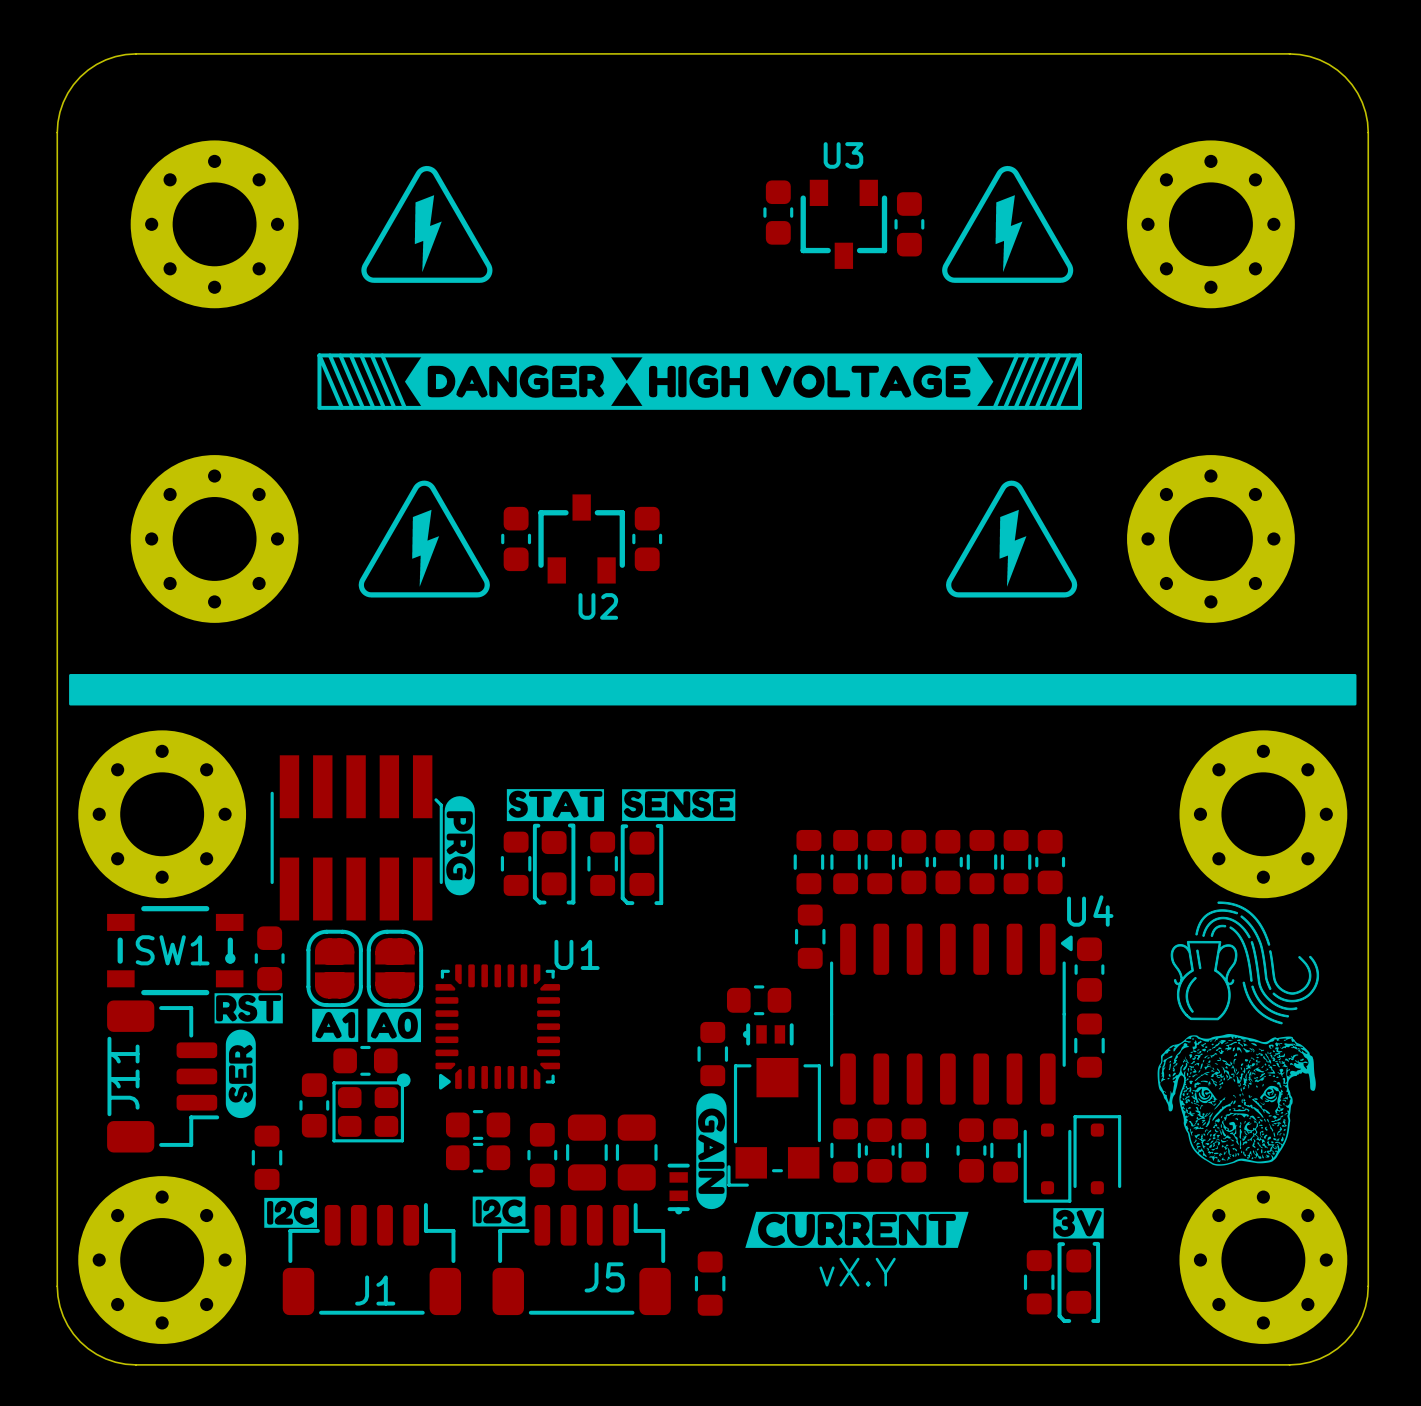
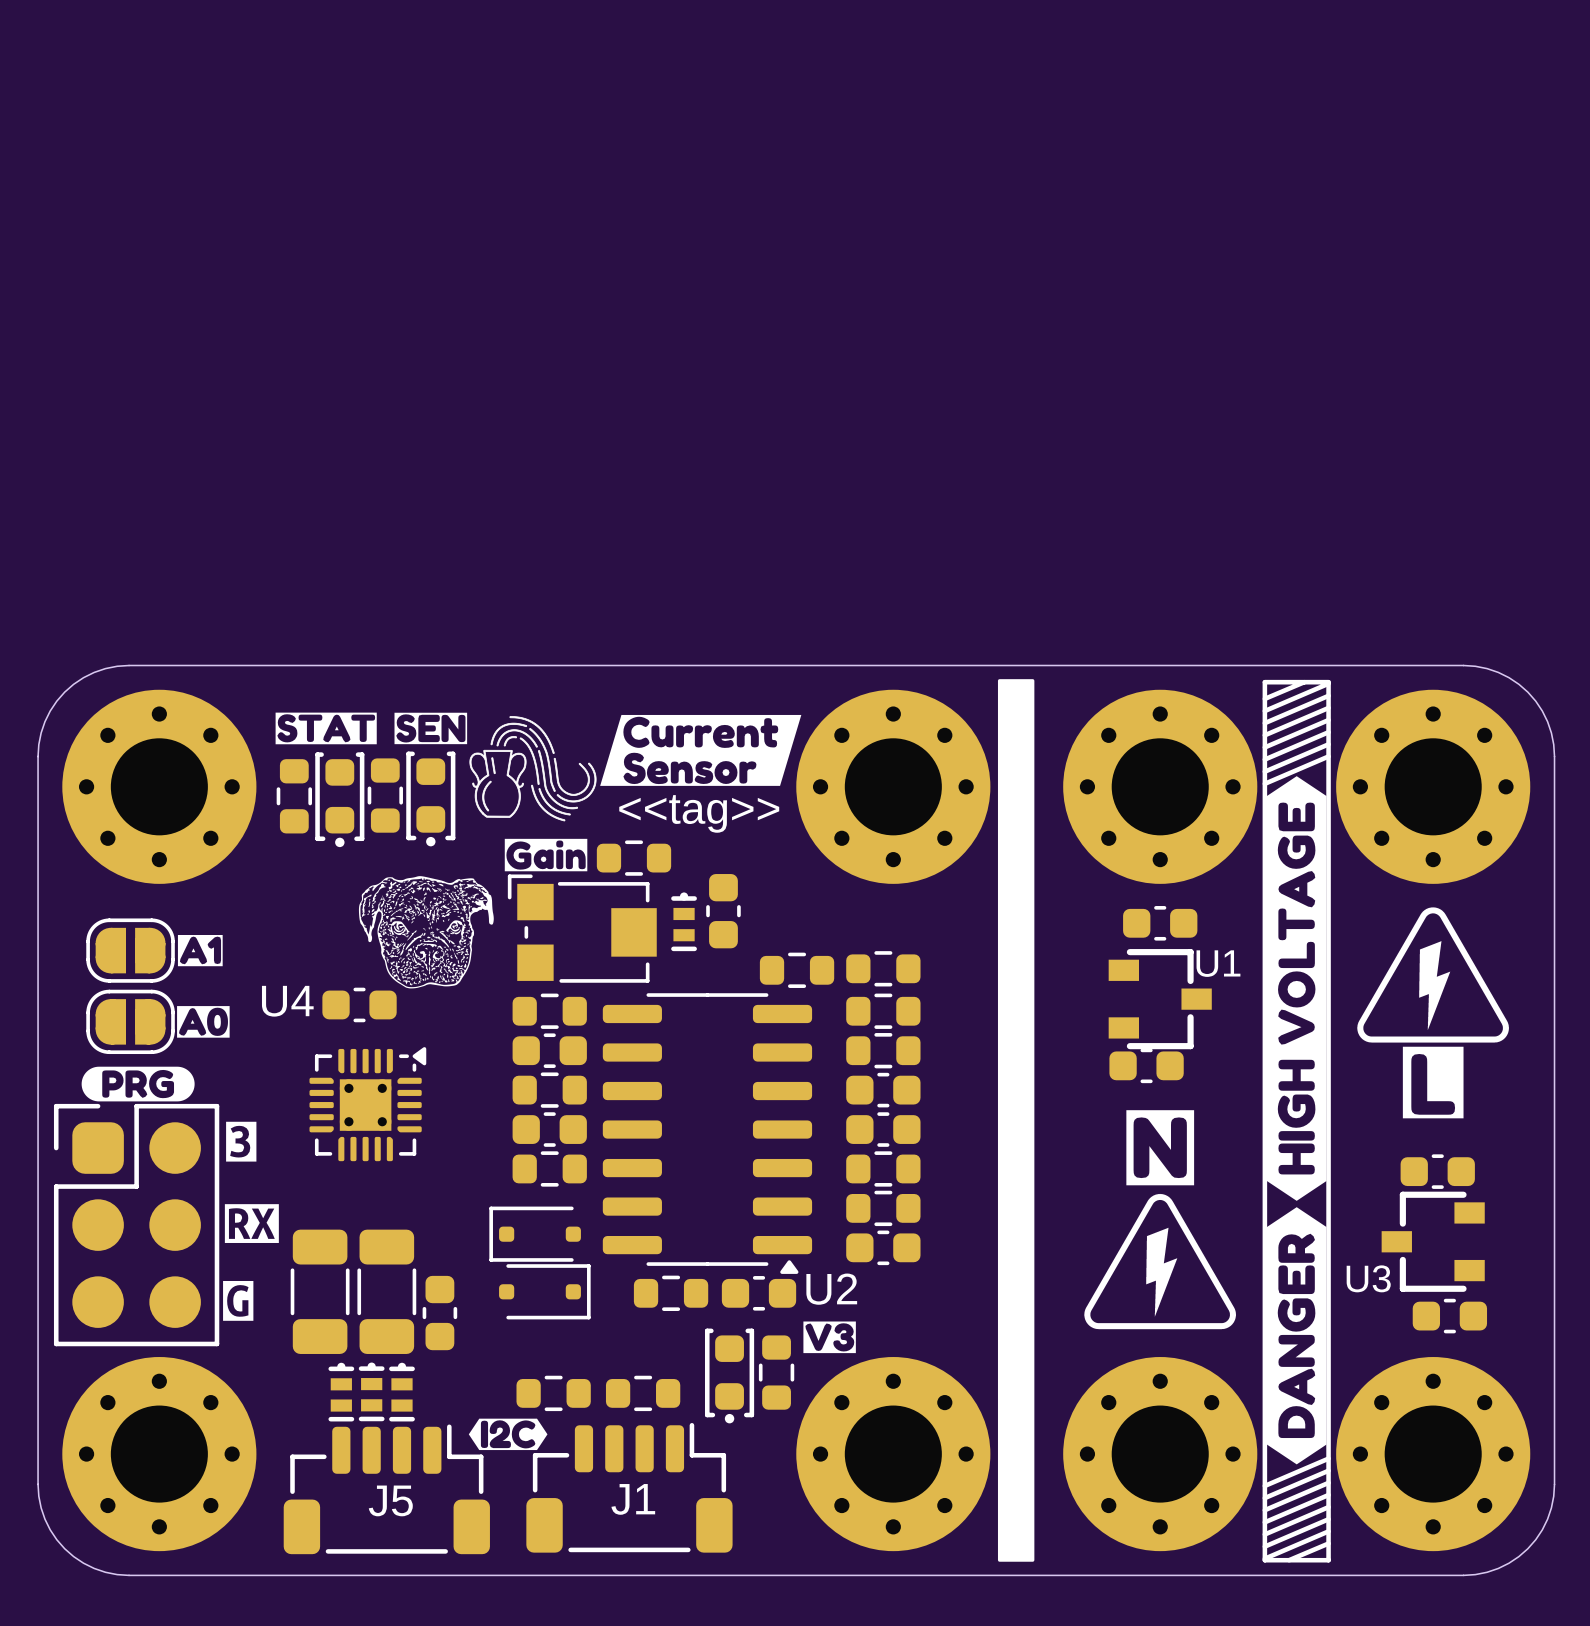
U3 name position: U3 (843, 155) -> U3 (1368, 1278)
drawing: [361, 165, 493, 283] -> none
drawing: [942, 165, 1074, 283] -> none
part: (778, 212) -> none
part: (214, 224) -> none
U3 rotation: 0° (843, 224) -> 90° clockwise (1433, 1241)
U3 position: (843, 224) -> (1433, 1241)
part: (909, 224) -> none
part: (1210, 224) -> none
line: (319, 355) (341, 407) -> none
line: (319, 355) (319, 407) (1079, 407) -> none
line: (319, 355) (1079, 355) -> none
line: (329, 355) (352, 407) -> none
line: (340, 355) (362, 407) -> none
line: (350, 355) (373, 407) -> none
line: (361, 355) (383, 407) -> none
line: (371, 355) (394, 407) -> none
line: (382, 355) (404, 407) -> none
drawing: [404, 355, 994, 408] -> none
line: (1017, 355) (994, 407) -> none
line: (1027, 355) (1005, 407) -> none
line: (1038, 355) (1015, 407) -> none
line: (1048, 355) (1026, 407) -> none
line: (1059, 355) (1036, 407) -> none
line: (1069, 355) (1047, 407) -> none
line: (1057, 407) (1079, 355) (1079, 407) -> none
drawing: [358, 480, 490, 598] -> none
drawing: [946, 480, 1078, 598] -> none
U2 footprint: [538, 494, 625, 584] -> [602, 993, 813, 1274]
part: (214, 538) -> none
part: (516, 538) -> none
part: (647, 538) -> none
part: (1210, 538) -> none
drawing: none -> [997, 679, 1035, 1562]
line: none -> (1264, 682) (1328, 682) (1328, 1560) (1264, 1560) (1264, 682)
line: none -> (1304, 682) (1264, 698)
line: none -> (1328, 683) (1264, 711)
line: none -> (1328, 695) (1264, 723)
U2 name position: U2 (598, 606) -> U2 (831, 1289)
line: none -> (1328, 707) (1264, 735)
drawing: none -> [275, 712, 802, 989]
line: none -> (1328, 720) (1264, 747)
line: none -> (1328, 732) (1264, 759)
line: none -> (1328, 744) (1264, 771)
board edge: (57, 656) (57, 122) (67, 93) (80, 76) (105, 59) (135, 53) (1289, 53) (1319, 59) (1337, 70) (1352, 84) (1362, 102) (1367, 122) (1368, 656) -> (38, 756) (41, 732) (44, 721) (50, 711) (64, 692) (73, 684) (94, 672) (117, 666) (129, 665) (1463, 665) (1487, 668) (1498, 672) (1509, 677) (1527, 692) (1535, 701) (1547, 721) (1551, 732) (1554, 756)
line: none -> (1328, 756) (1264, 783)
drawing: none -> [1084, 776, 1509, 1465]
drawing: [69, 674, 1357, 706] -> none
part: none -> (159, 786)
part: none -> (893, 786)
part: none -> (1160, 786)
part: none -> (1433, 786)
part: none -> (385, 795)
part: none -> (294, 796)
part: none -> (430, 798)
part: none -> (339, 799)
text: none -> <<tag>> (699, 813)
part: none -> (634, 858)
drawing: [506, 789, 736, 822] -> none
part: none -> (723, 911)
drawing: [444, 796, 475, 896] -> none
part: none -> (684, 921)
part: none -> (1160, 923)
drawing: none -> [177, 934, 223, 967]
part: (162, 814) -> none
part: (1263, 814) -> none
part: none -> (130, 950)
part: (356, 837) -> none
part: none -> (883, 968)
part: none -> (797, 970)
part: (808, 862) -> none
part: (845, 862) -> none
part: (879, 862) -> none
part: (913, 862) -> none
part: (947, 862) -> none
part: (981, 862) -> none
part: (1016, 862) -> none
part: (1050, 862) -> none
part rotation: 0° (516, 863) -> 90° clockwise (549, 1011)
part: (602, 863) -> none
part: (554, 864) -> none
part: (641, 864) -> none
part: none -> (359, 1004)
drawing: none -> [81, 1006, 230, 1102]
part: none -> (883, 1011)
part: none -> (130, 1021)
drawing: [1157, 901, 1320, 1166] -> none
part: none -> (549, 1050)
part: none -> (883, 1050)
U4 name position: U4 (1090, 911) -> U4 (287, 1001)
U4 footprint: [830, 923, 1073, 1105] -> [309, 1047, 427, 1162]
part: none -> (1146, 1065)
part: (810, 936) -> none
part: none -> (549, 1090)
part: none -> (883, 1090)
SW1: (175, 950) -> none
part: (269, 958) -> none
U1 footprint: [435, 964, 561, 1090] -> [1108, 949, 1212, 1050]
part: (334, 968) -> none
part: (394, 968) -> none
part: (1089, 969) -> none
part: none -> (549, 1129)
part: none -> (883, 1129)
drawing shape: [214, 993, 283, 1024] -> [226, 1121, 257, 1162]
part: (759, 1000) -> none
drawing: [312, 1008, 422, 1043] -> none
part: none -> (549, 1168)
part: none -> (883, 1168)
part: none -> (1437, 1171)
drawing shape: [225, 1029, 256, 1119] -> [224, 1204, 279, 1243]
part: (768, 1034) -> none
part: (1089, 1045) -> none
part: none -> (883, 1208)
part: (712, 1054) -> none
part: (365, 1060) -> none
part: none -> (136, 1225)
part: none -> (535, 1234)
part footprint: [299, 1073, 330, 1138] -> [290, 1229, 350, 1354]
part footprint: [332, 1073, 411, 1143] -> [357, 1229, 417, 1354]
J11: (163, 1076) -> none
part: none -> (883, 1247)
drawing: [696, 1093, 969, 1248] -> none
drawing: none -> [223, 1281, 254, 1321]
part footprint: [445, 1110, 511, 1140] -> [499, 1264, 591, 1320]
part: none -> (671, 1293)
part: none -> (759, 1293)
part rotation: 0° (774, 1122) -> 90° clockwise (582, 928)
part position: (774, 1122) -> (582, 928)
part: none -> (439, 1313)
part: none -> (1449, 1316)
drawing: none -> [803, 1321, 856, 1354]
part: (845, 1150) -> none
part: (879, 1150) -> none
part: (913, 1150) -> none
part: (971, 1150) -> none
part: (1005, 1150) -> none
part: (586, 1152) -> none
part: (636, 1152) -> none
part: (1097, 1154) -> none
part: (542, 1155) -> none
part: (267, 1157) -> none
part: (478, 1157) -> none
part: (1047, 1163) -> none
part: (678, 1189) -> none
part: none -> (776, 1372)
part: none -> (729, 1375)
drawing: [472, 1196, 526, 1227] -> none
drawing: [264, 1197, 317, 1228] -> none
part: none -> (341, 1392)
part: none -> (371, 1391)
part: none -> (401, 1392)
part: none -> (553, 1393)
part: none -> (643, 1393)
drawing: [1053, 1208, 1104, 1239] -> none
drawing: none -> [468, 1418, 548, 1451]
part footprint: [1023, 1250, 1055, 1315] -> [1063, 1357, 1258, 1552]
J1 position: (371, 1259) -> (629, 1487)
J5 position: (581, 1259) -> (386, 1489)
part: none -> (893, 1454)
line: none -> (1328, 1458) (1264, 1485)
text: vX.Y (857, 1272) -> none
line: none -> (1328, 1470) (1264, 1498)
J5 name position: J5 (604, 1277) -> J5 (390, 1500)
part: (1078, 1282) -> none
part: (710, 1283) -> none
line: none -> (1328, 1482) (1264, 1510)
J1 name position: J1 (375, 1290) -> J1 (633, 1499)
line: none -> (1328, 1495) (1264, 1522)
line: none -> (1328, 1507) (1264, 1534)
line: none -> (1328, 1519) (1264, 1546)
line: none -> (1328, 1531) (1264, 1558)
line: none -> (1328, 1543) (1289, 1560)

